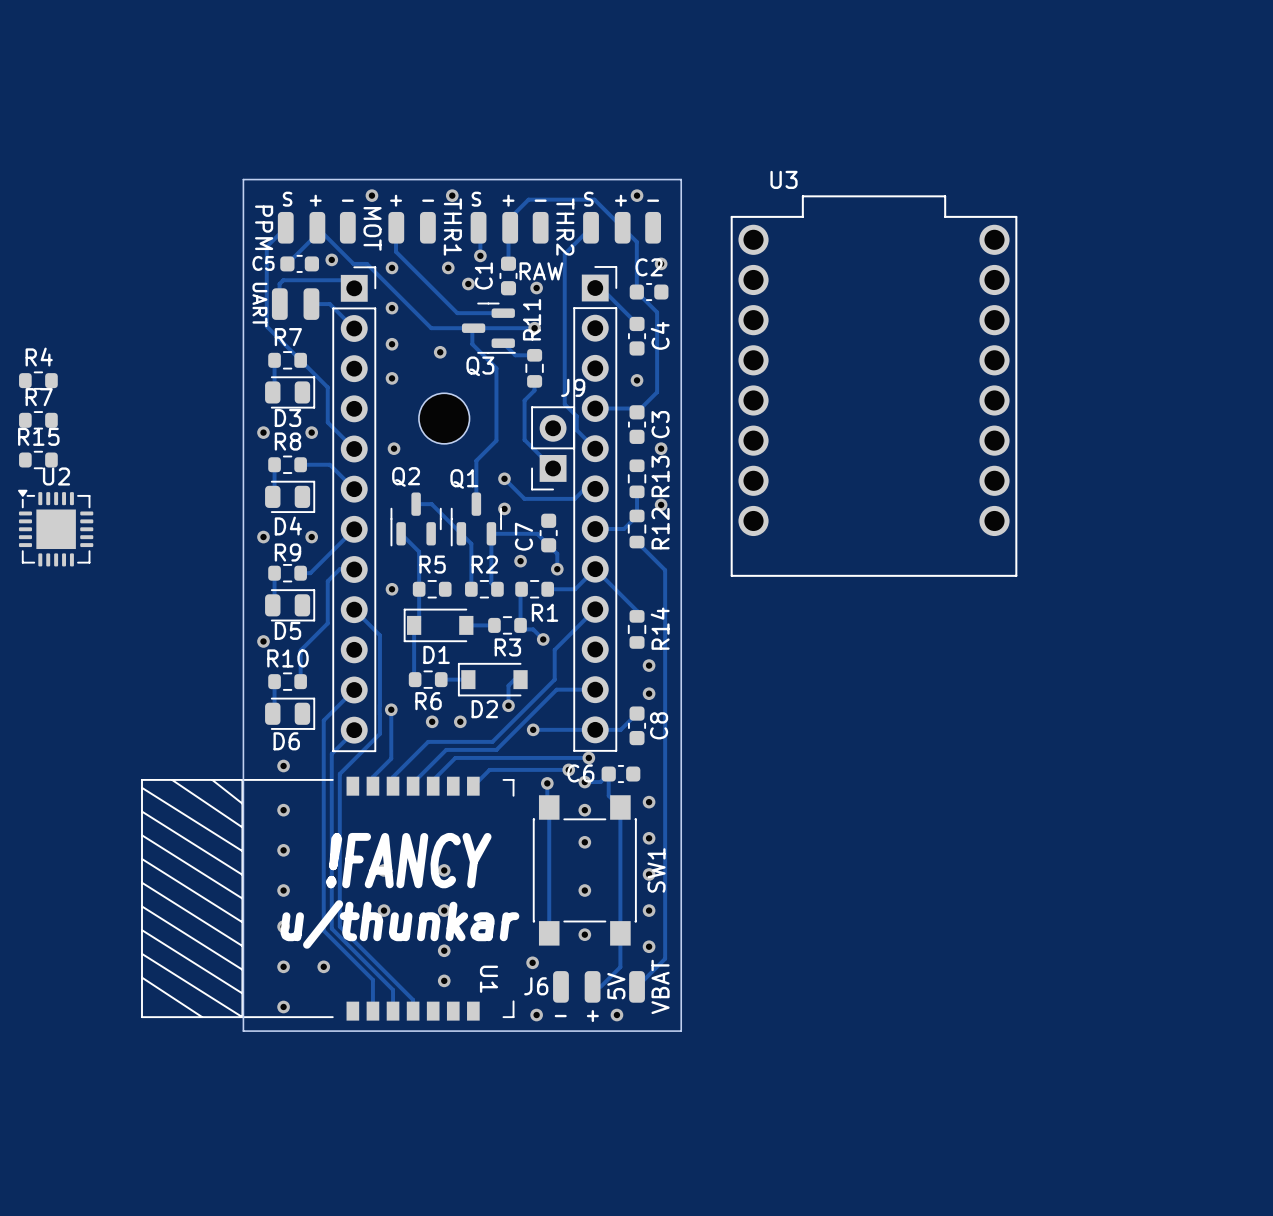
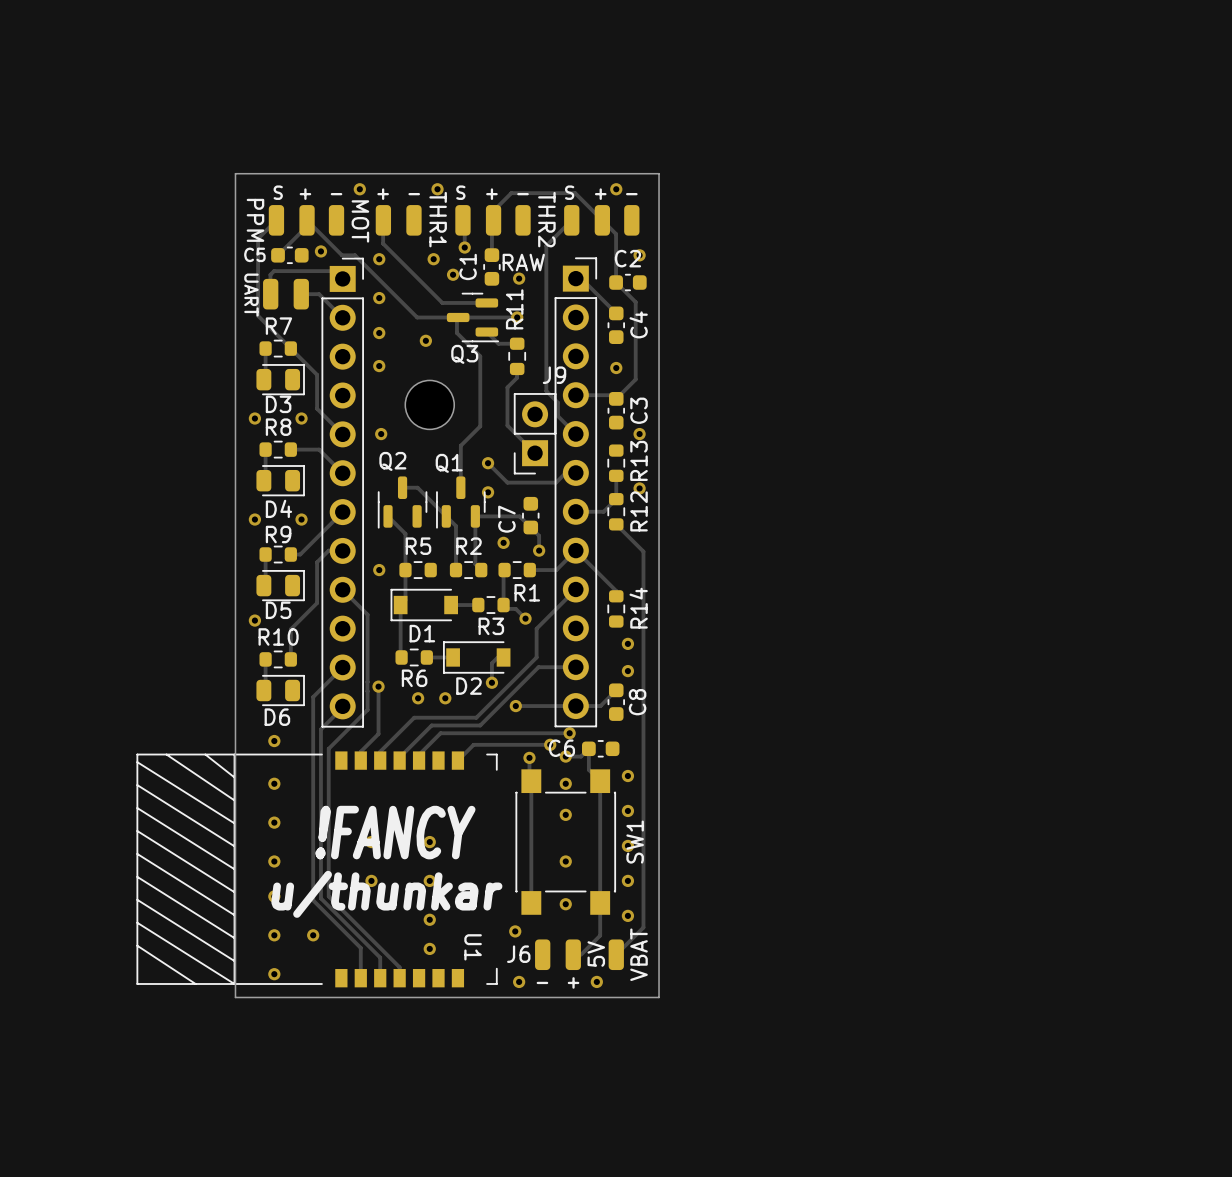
R4: (38, 380) -> none
U3: (874, 386) -> none
R7: (38, 420) -> none
R15: (38, 460) -> none
U2: (55, 528) -> none

